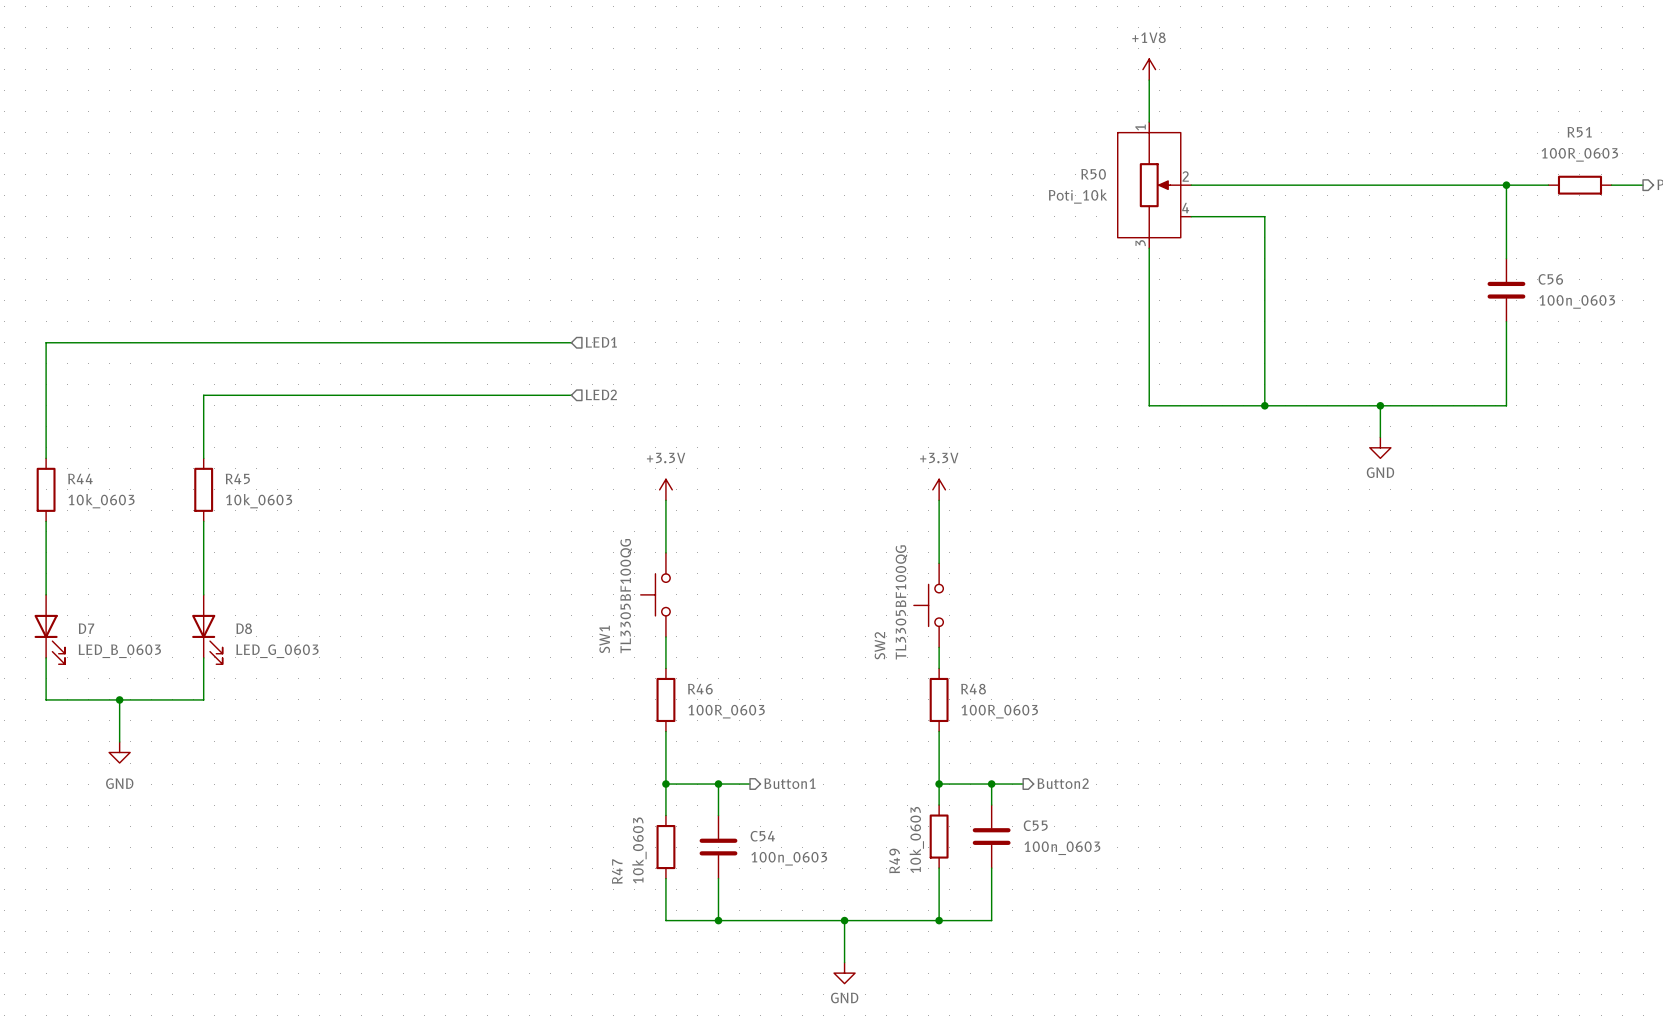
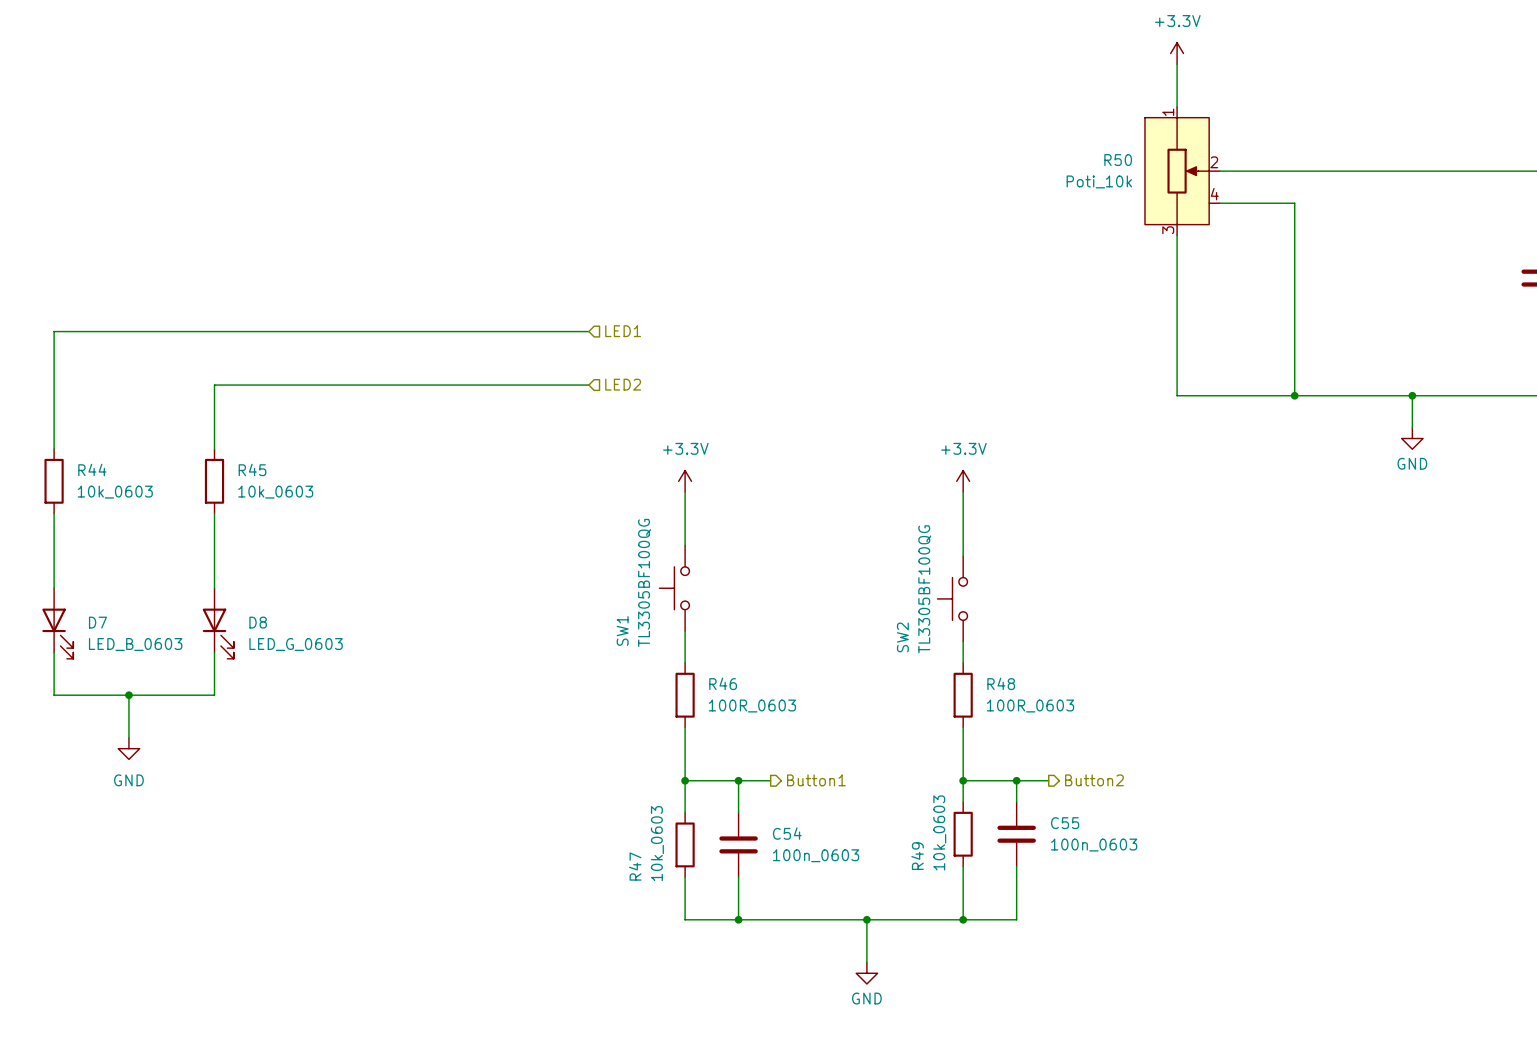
power symbol: +1V8 (1149, 69) -> +3.3V (1177, 53)

